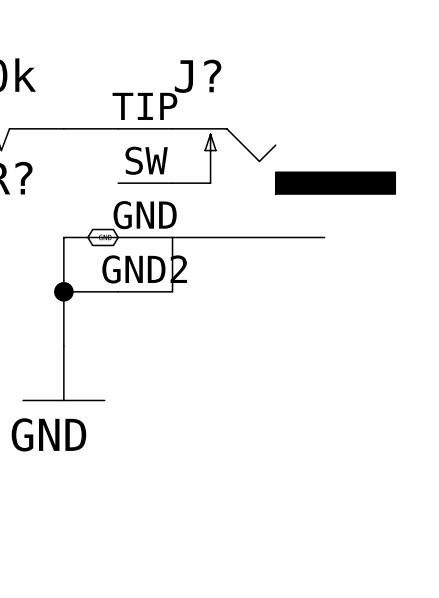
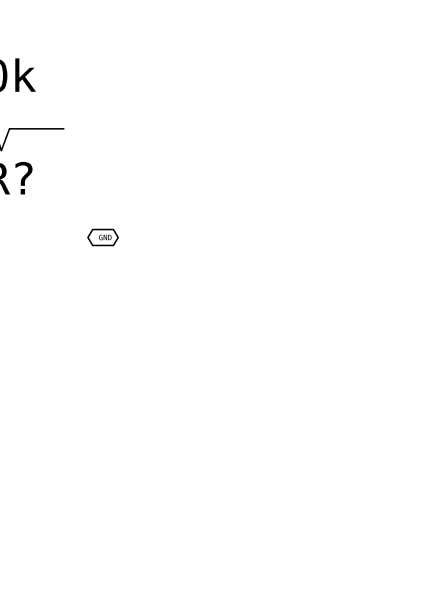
wire: (63, 128) (118, 128) -> none
J?: (256, 210) -> none
wire: (118, 237) (63, 237) (63, 346) -> none
wire: (63, 291) (118, 291) -> none
junction: (63, 291) -> none
power symbol: GND (63, 373) -> none

